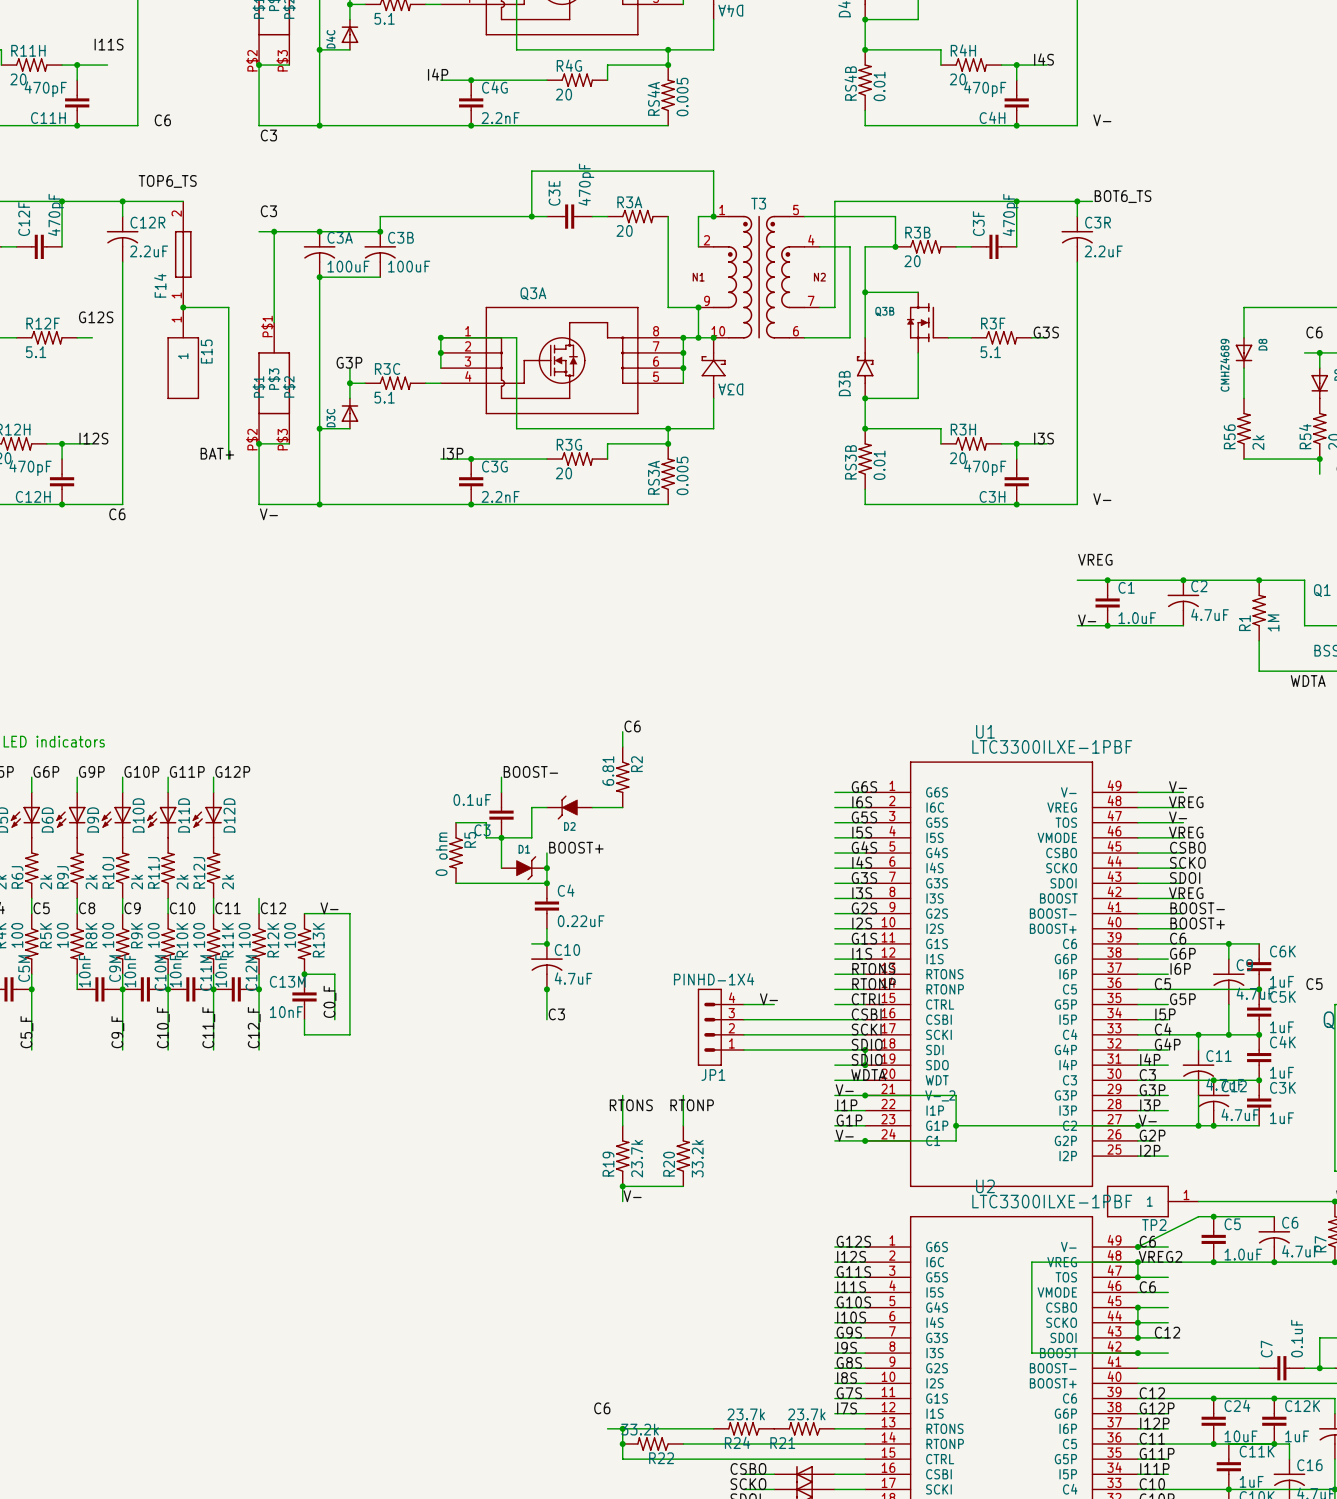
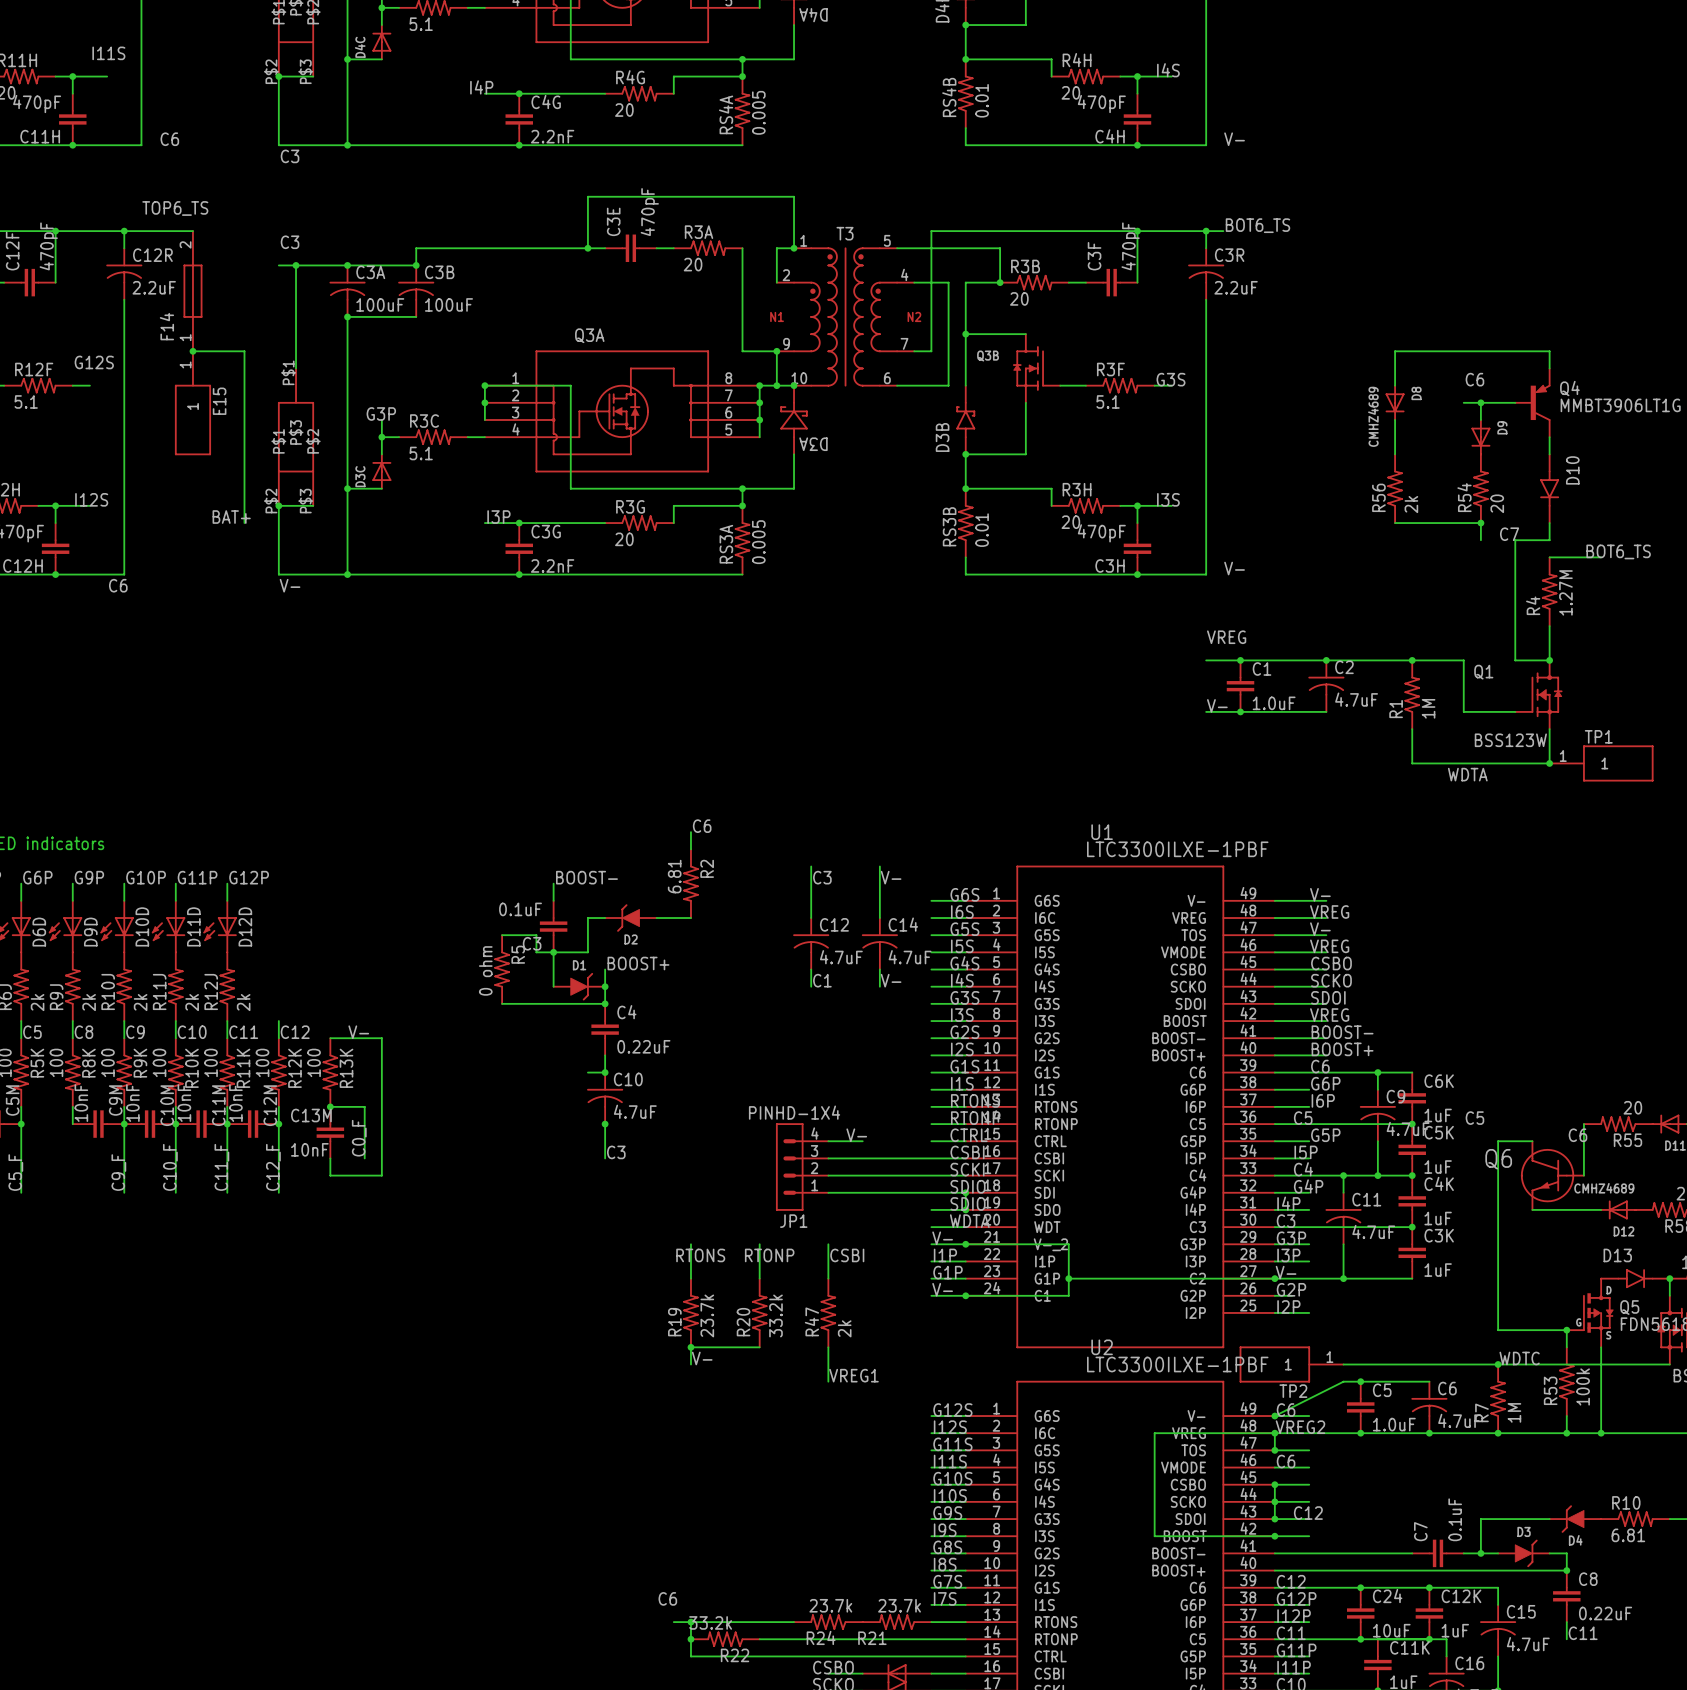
wire: none -> (811, 866) (811, 918)
wire: none -> (879, 866) (879, 918)
label: none -> C3 (822, 877)
label: none -> V- (891, 877)
C14: none -> 4.7uF (879, 943)
wire: none -> (811, 969) (811, 986)
wire: none -> (879, 969) (879, 986)
label: none -> C1 (822, 980)
label: none -> V- (891, 980)
junction: (1213, 1080) -> none
wire: none -> (828, 1244) (828, 1278)
C12 position: (1213, 1103) -> (811, 943)
label: none -> CSBI (847, 1255)
junction: (1213, 1125) -> none
R47: none -> 2k (828, 1312)
wire: none -> (828, 1347) (828, 1381)
label: none -> VREG1 (853, 1375)

